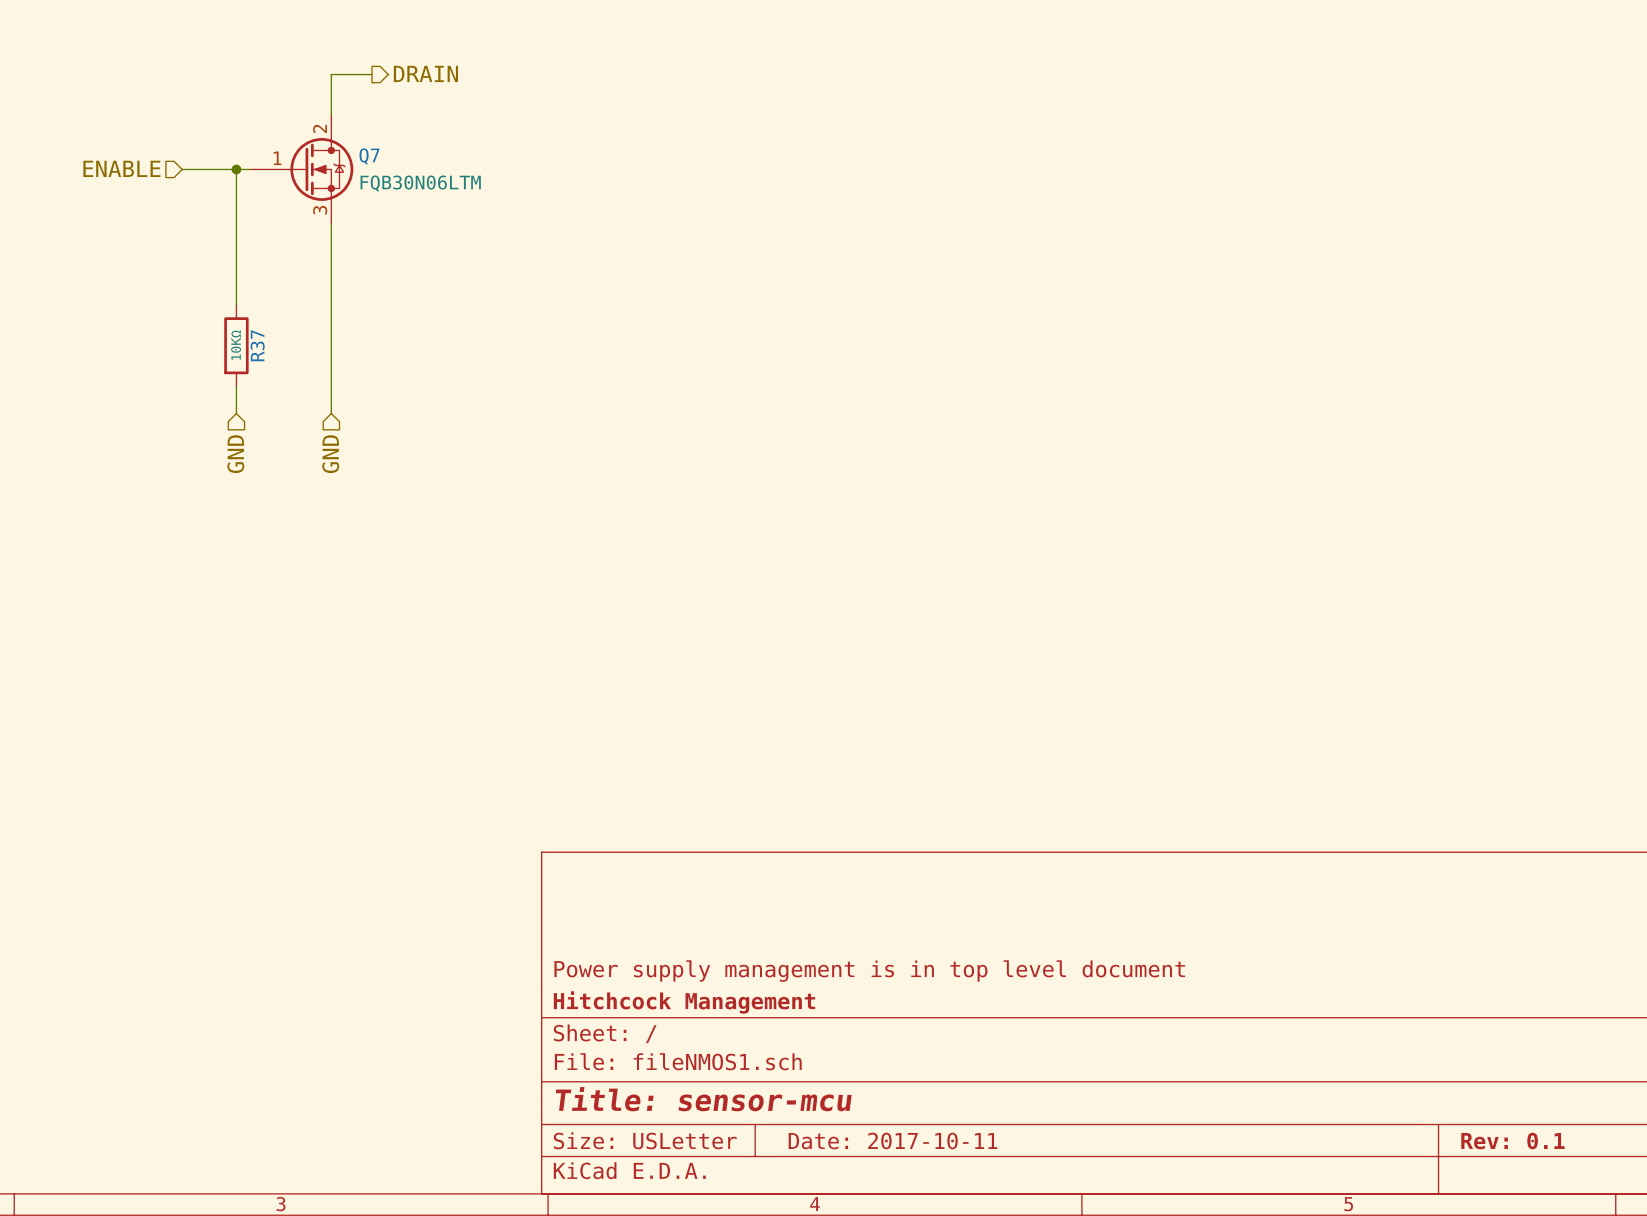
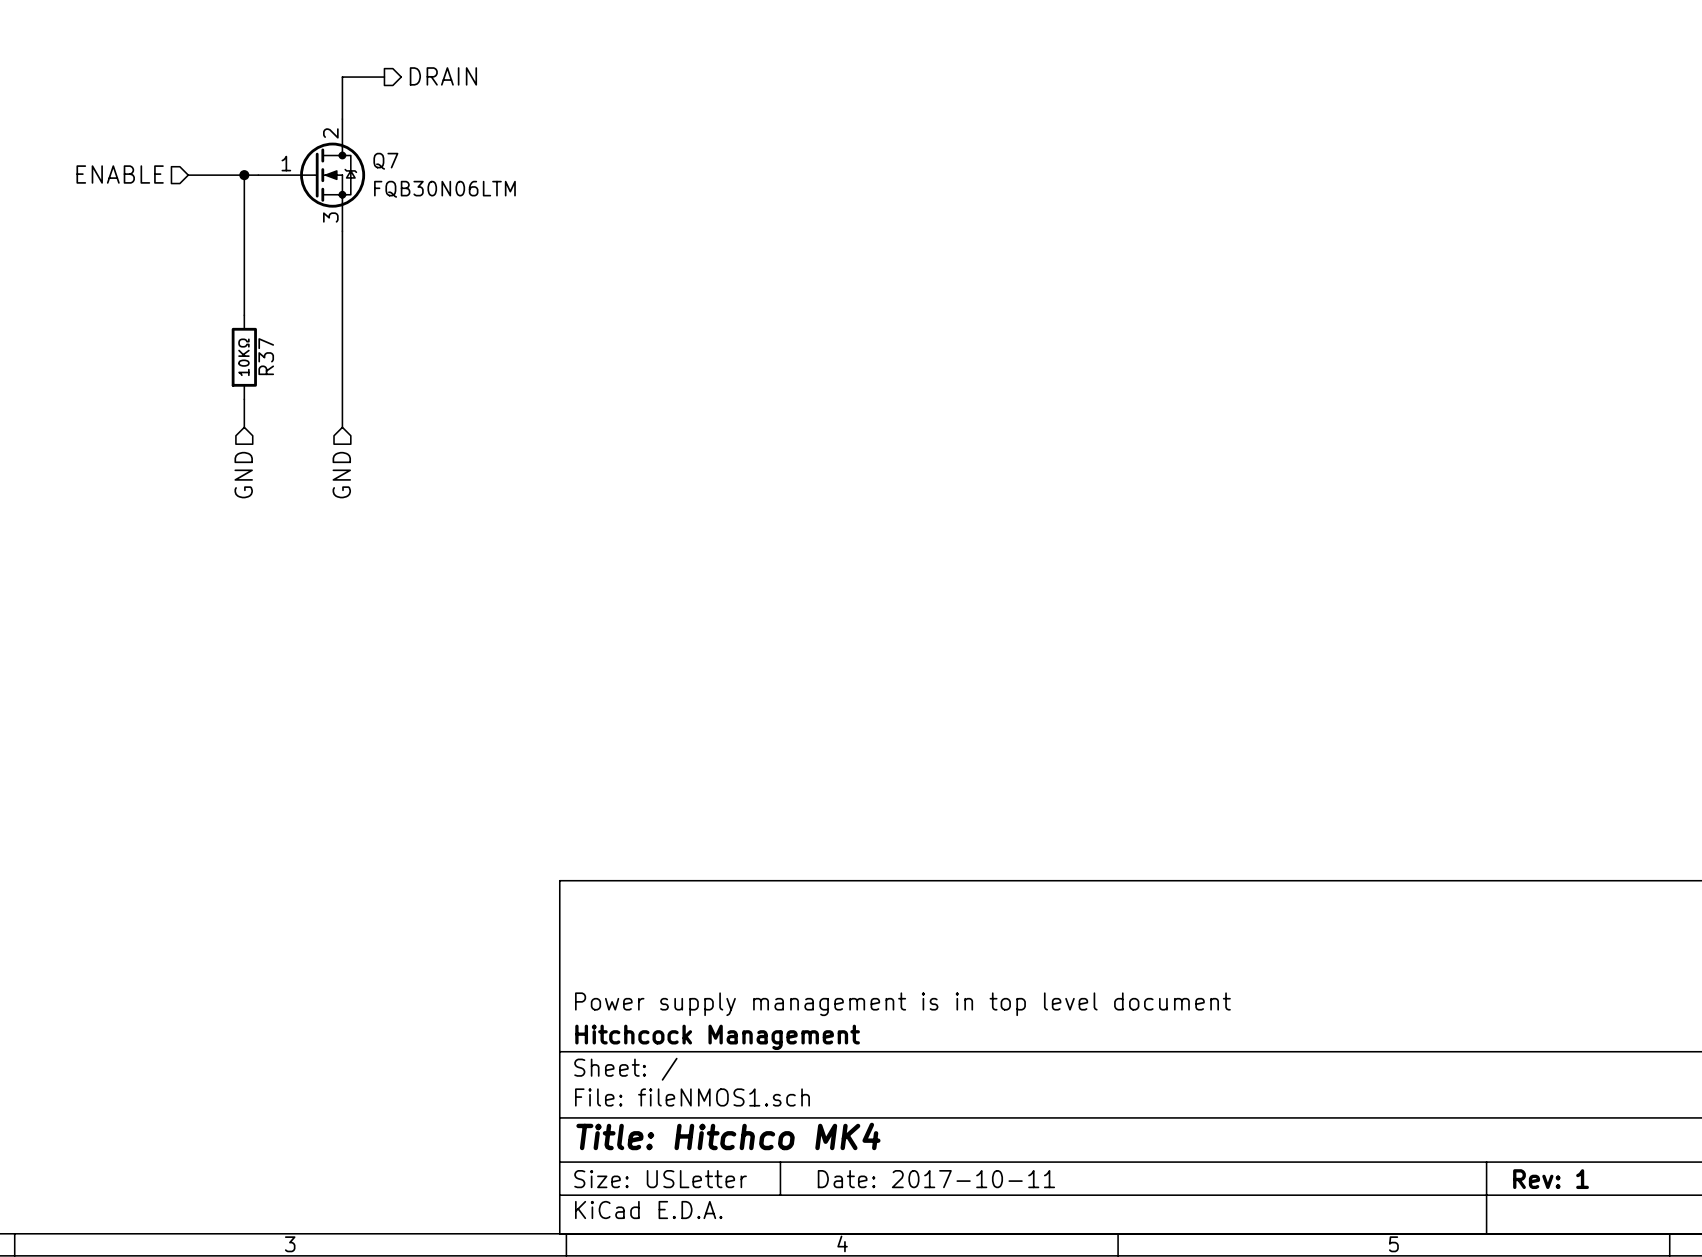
title block: Title: sensor-mcu (703, 1099) -> Title: Hitchco MK4 (728, 1136)
title block: Rev: 0.1 (1512, 1140) -> Rev: 1 (1551, 1179)

